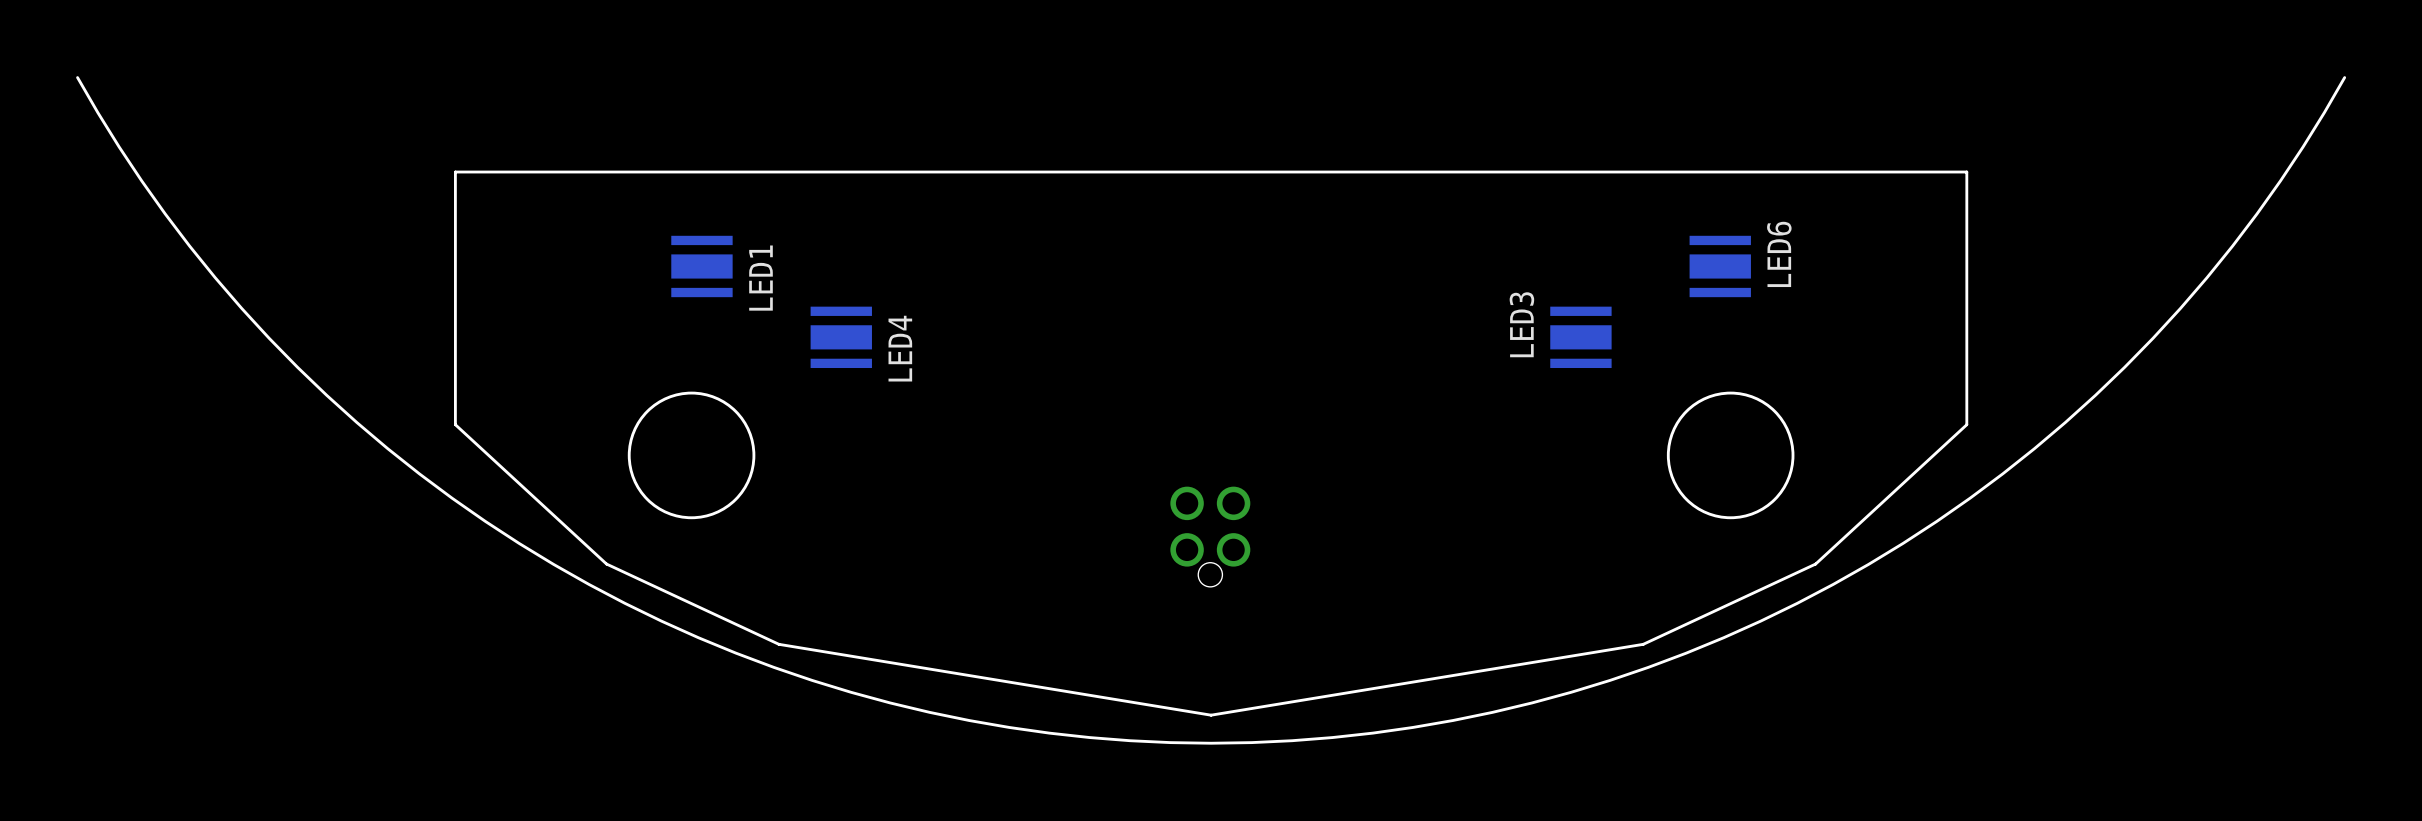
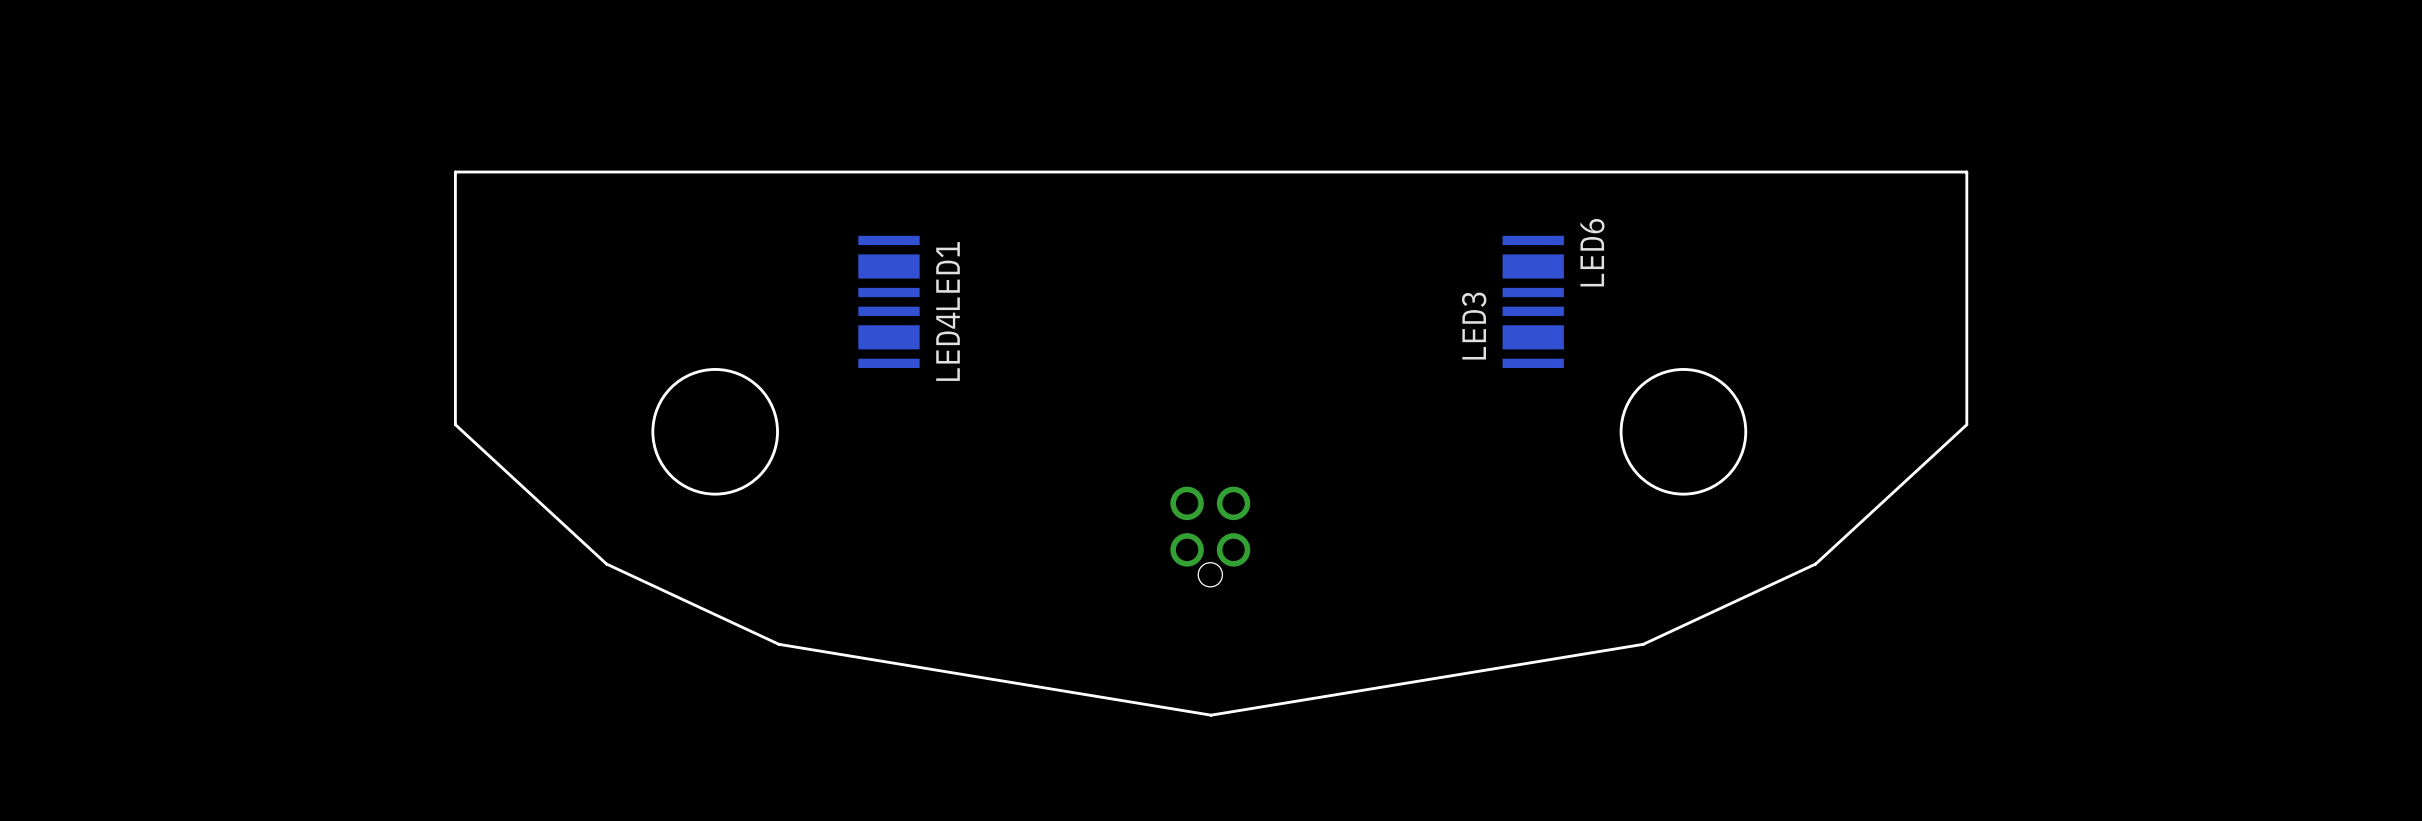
board edge: (2344, 77) (2302, 147) (2257, 213) (2207, 277) (2153, 338) (2095, 395) (2034, 448) (1936, 521) (1868, 564) (1797, 603) (1686, 653) (1609, 680) (1532, 702) (1452, 720) (1372, 733) (1292, 740) (1211, 743) (1130, 740) (1049, 733) (969, 720) (890, 702) (812, 680) (735, 653) (624, 603) (553, 564) (485, 521) (387, 448) (326, 395) (269, 338) (215, 277) (165, 213) (119, 147) (77, 77) -> none
LED1 position: (701, 266) -> (888, 266)
LED6 position: (1720, 266) -> (1533, 266)
LED4 position: (841, 337) -> (888, 337)
LED3 position: (1580, 337) -> (1533, 337)
round board edge position: (691, 455) -> (715, 431)
round board edge position: (1730, 455) -> (1683, 431)

